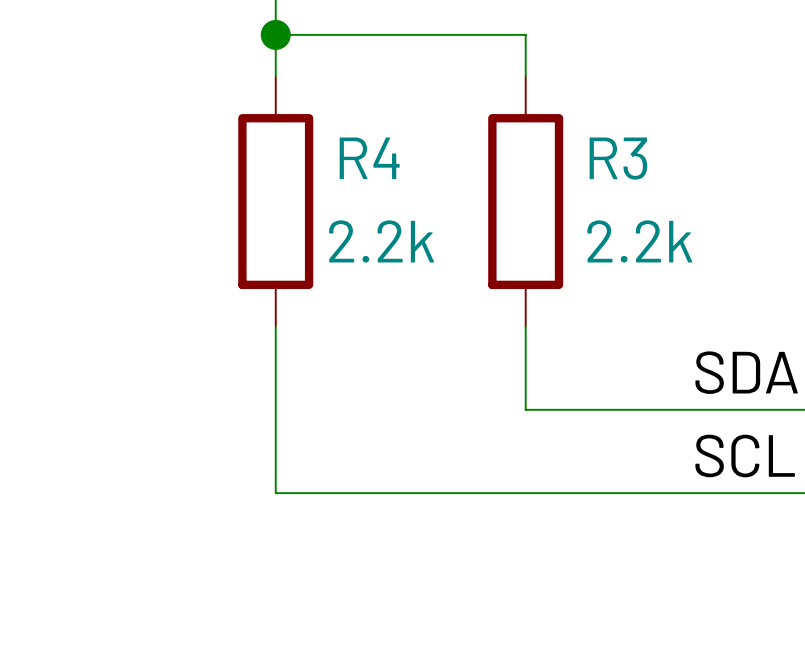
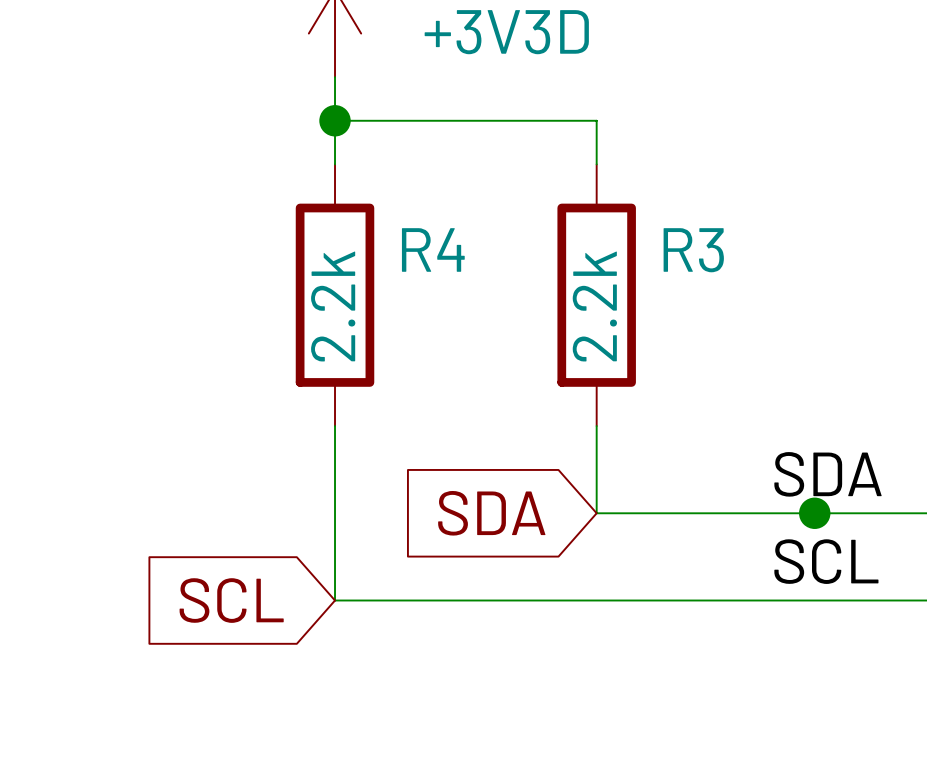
R4 value rotation: 0° (381, 241) -> 90° counterclockwise (333, 306)
R3 value rotation: 0° (639, 241) -> 90° counterclockwise (594, 306)
global label: none -> SDA (491, 513)
junction: none -> (814, 513)
global label: none -> SCL (231, 600)

